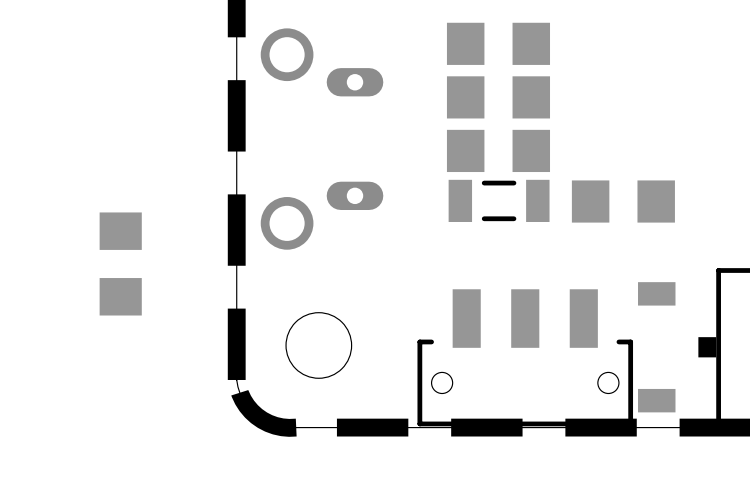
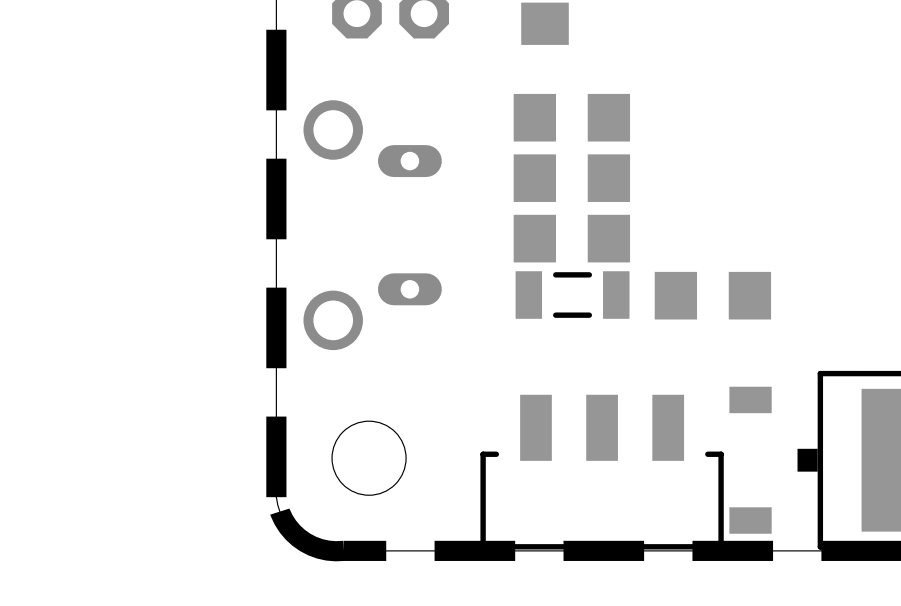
part: (120, 263) -> none
part footprint: [417, 289, 634, 427] -> [480, 394, 724, 550]

